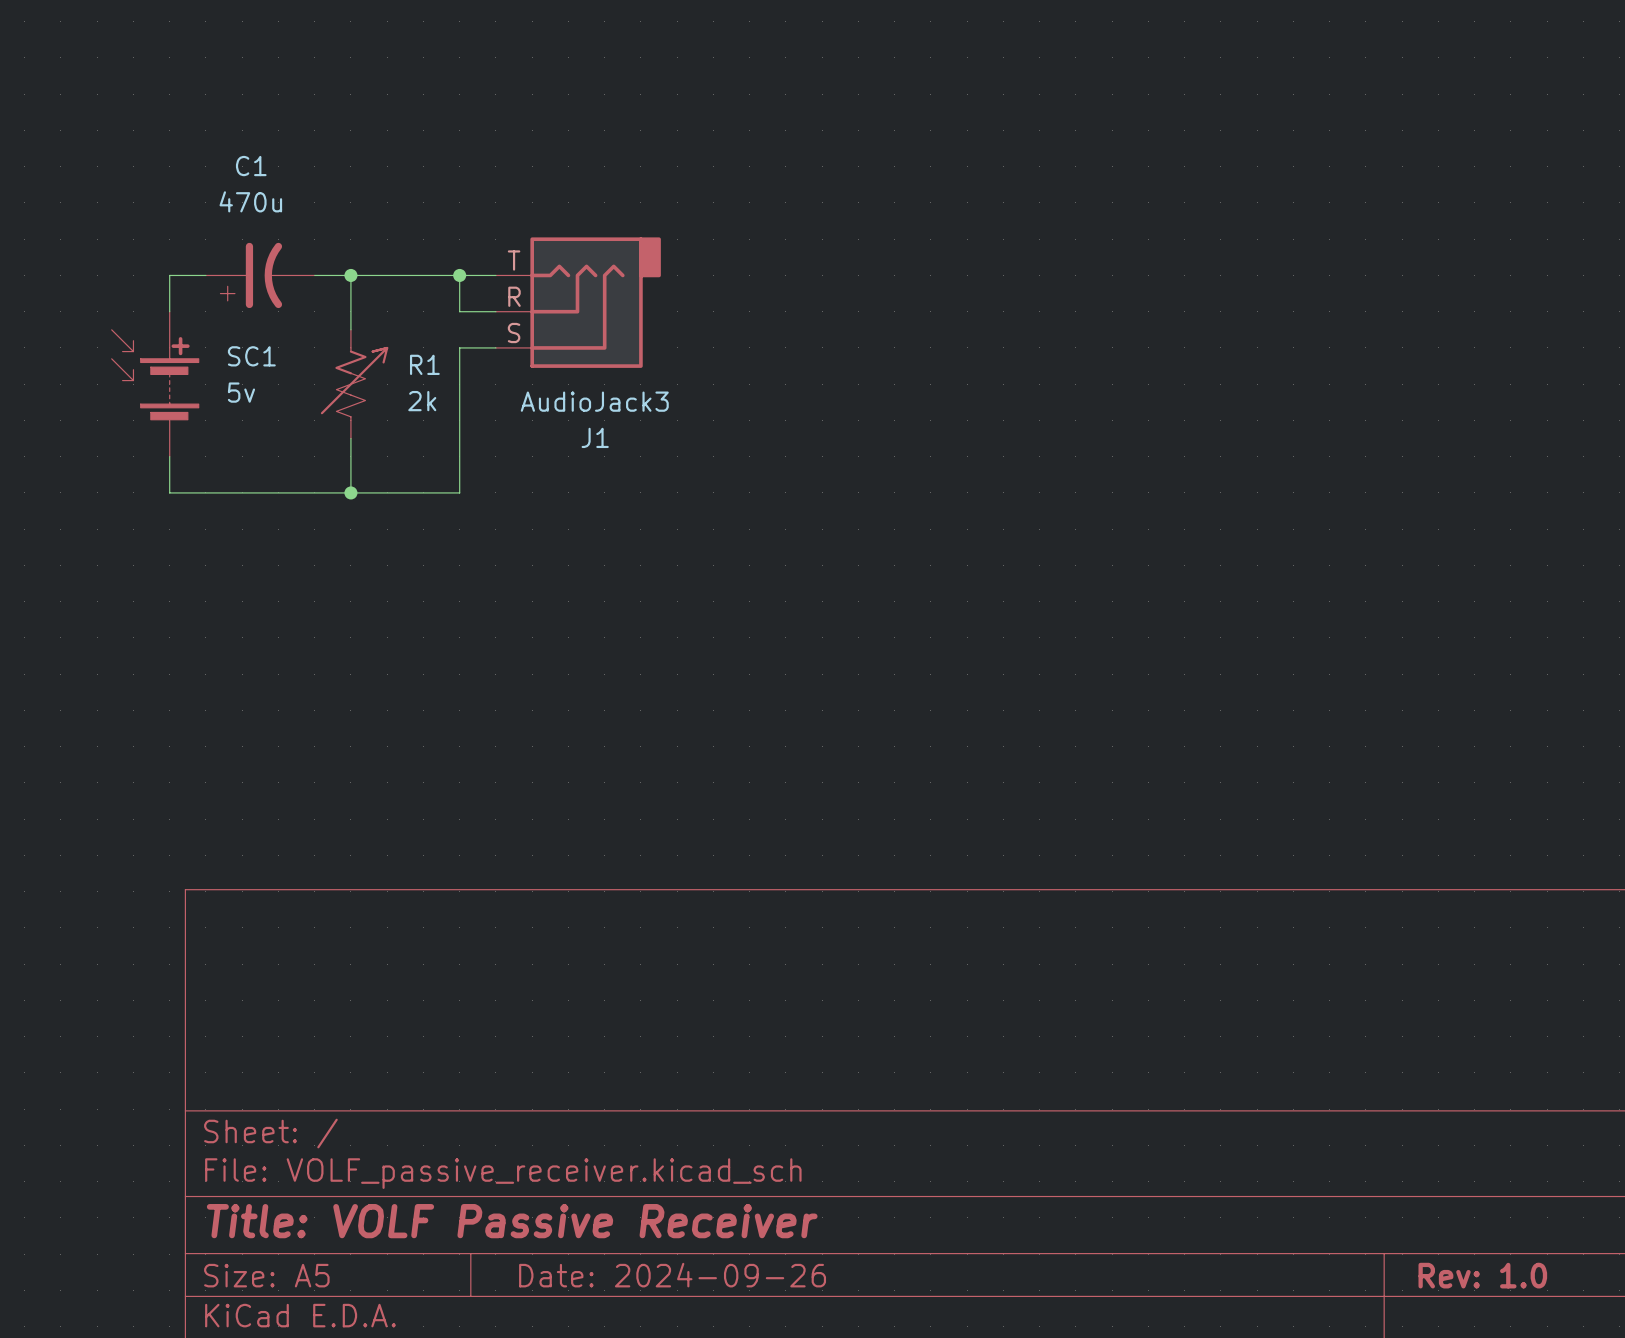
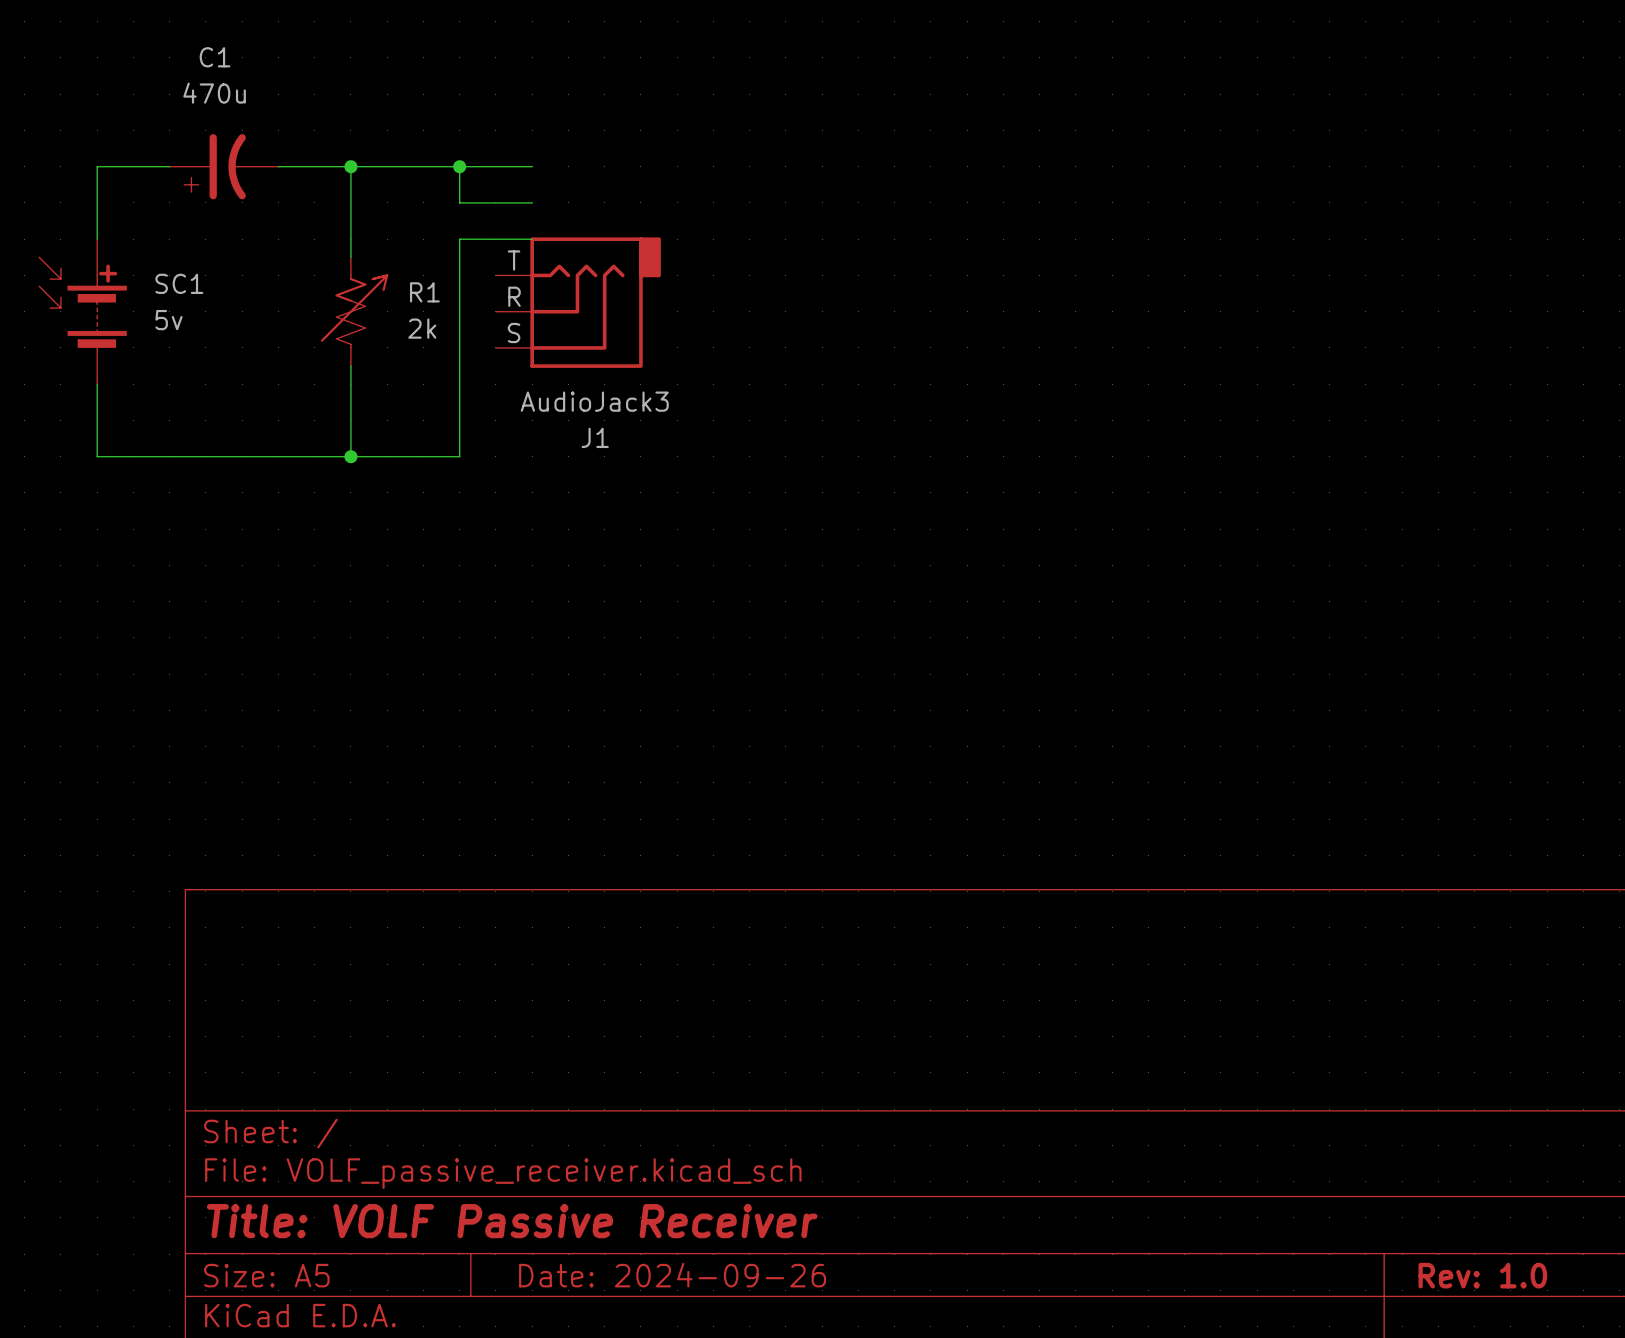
wire: none -> (169, 166) (97, 166) (97, 239)
wire: none -> (278, 166) (532, 166)
wire: none -> (350, 166) (350, 257)
junction: none -> (350, 166)
wire: none -> (459, 166) (459, 202) (532, 202)
junction: none -> (459, 166)
wire: none -> (532, 239) (459, 239) (459, 275)
wire: (205, 275) (169, 275) (169, 311) -> none
C1 position: (260, 275) -> (224, 166)
wire: (314, 275) (495, 275) -> none
wire: (350, 275) (350, 329) -> none
junction: (350, 275) -> none
junction: (459, 275) -> none
wire: (459, 311) (495, 311) -> (459, 311) (459, 347)
wire: (459, 347) (495, 347) -> none
wire: none -> (350, 366) (350, 438)
SC1 position: (155, 384) -> (82, 311)
R1 position: (354, 384) -> (354, 311)
wire: (169, 456) (169, 492) (459, 492) (459, 456) -> (97, 384) (97, 456) (459, 456)
wire: (350, 456) (350, 492) -> none
junction position: (350, 492) -> (350, 456)

